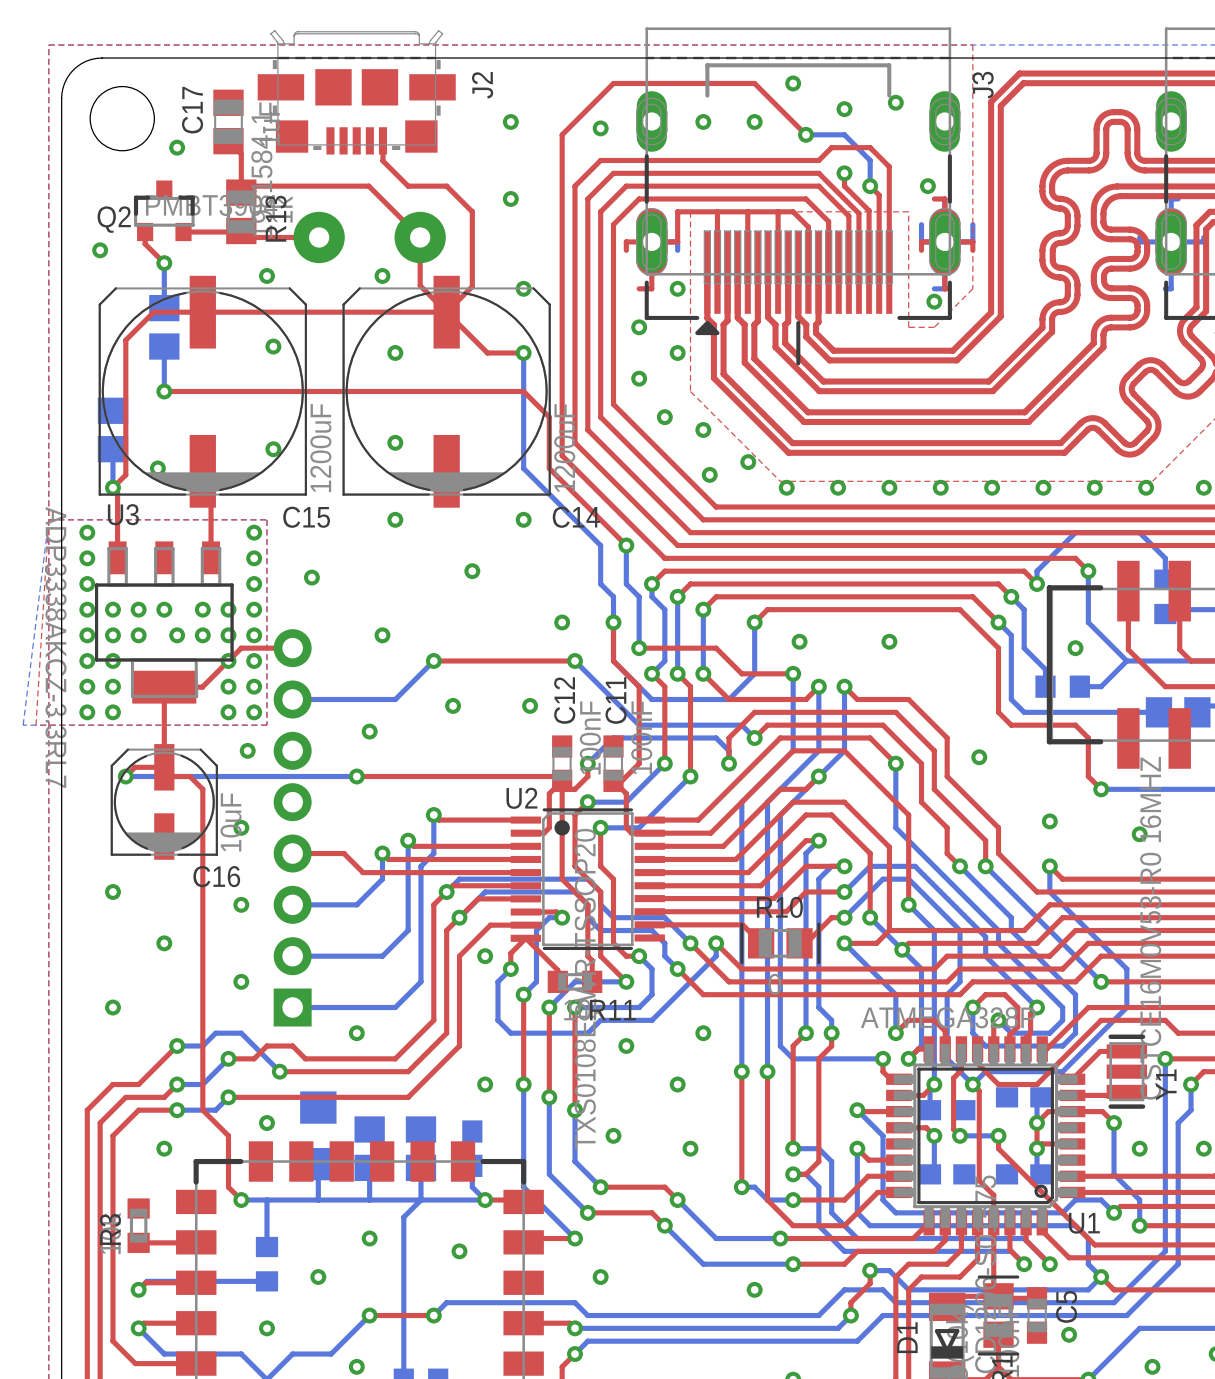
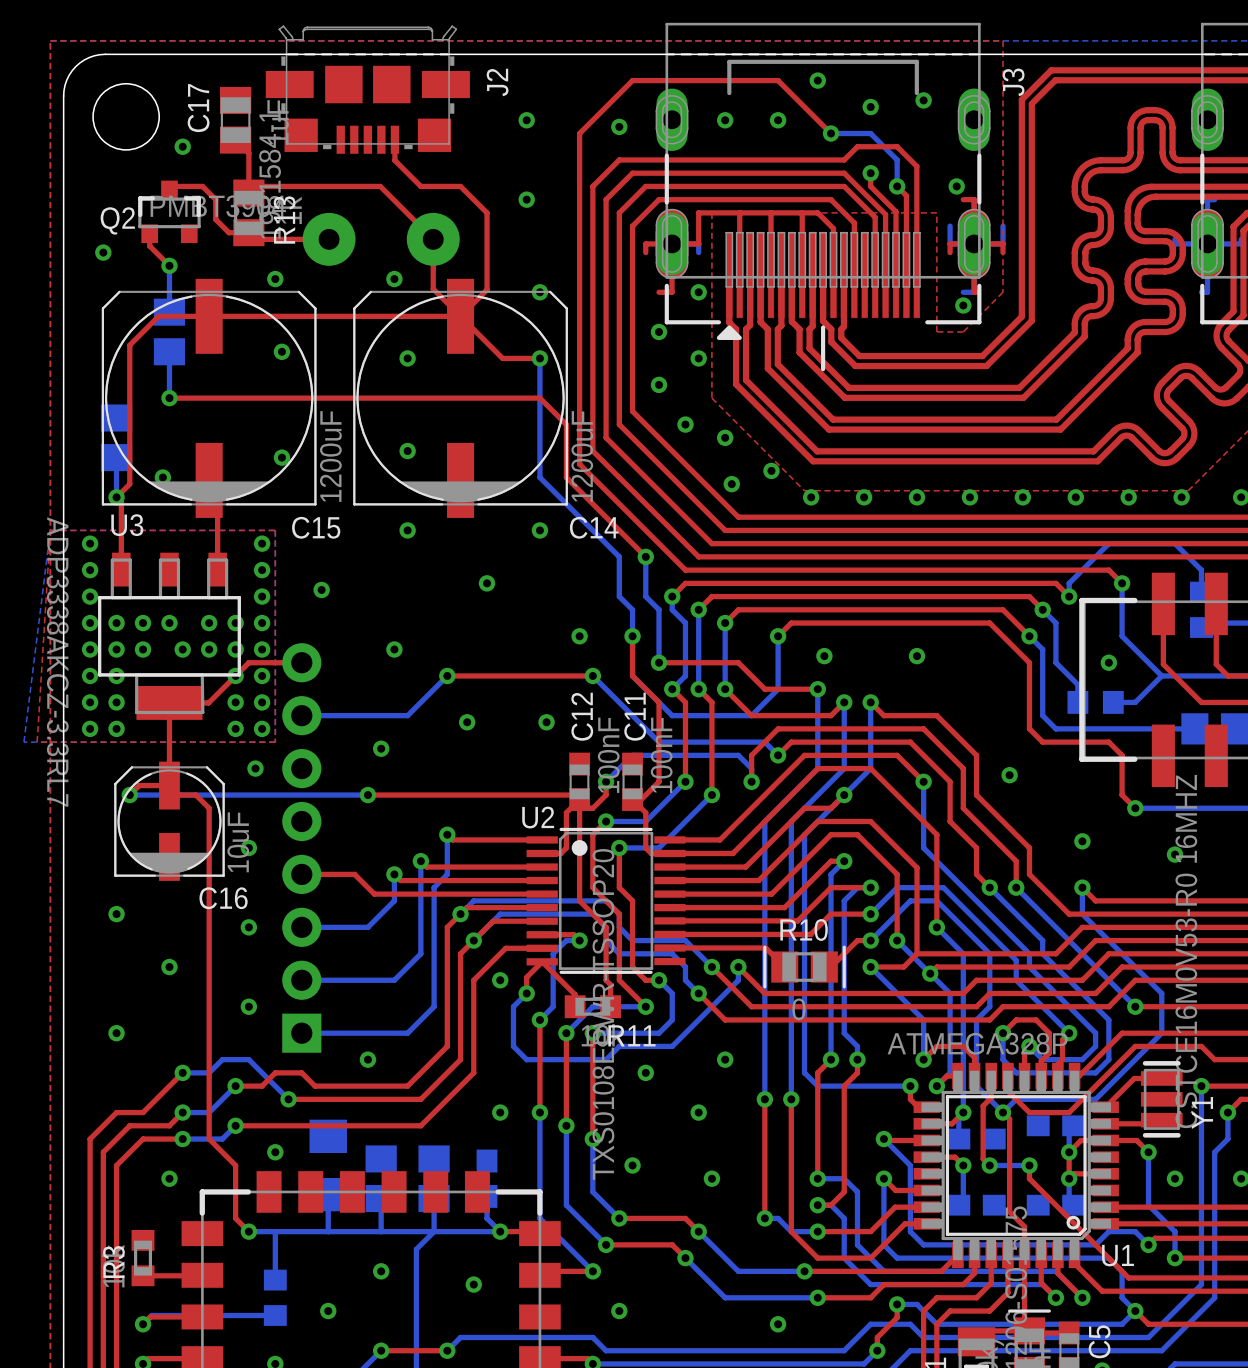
top track: (241, 231) (183, 232) -> (248, 232) (228, 232) (215, 219) (215, 199) (202, 186) (173, 186) (169, 189)

